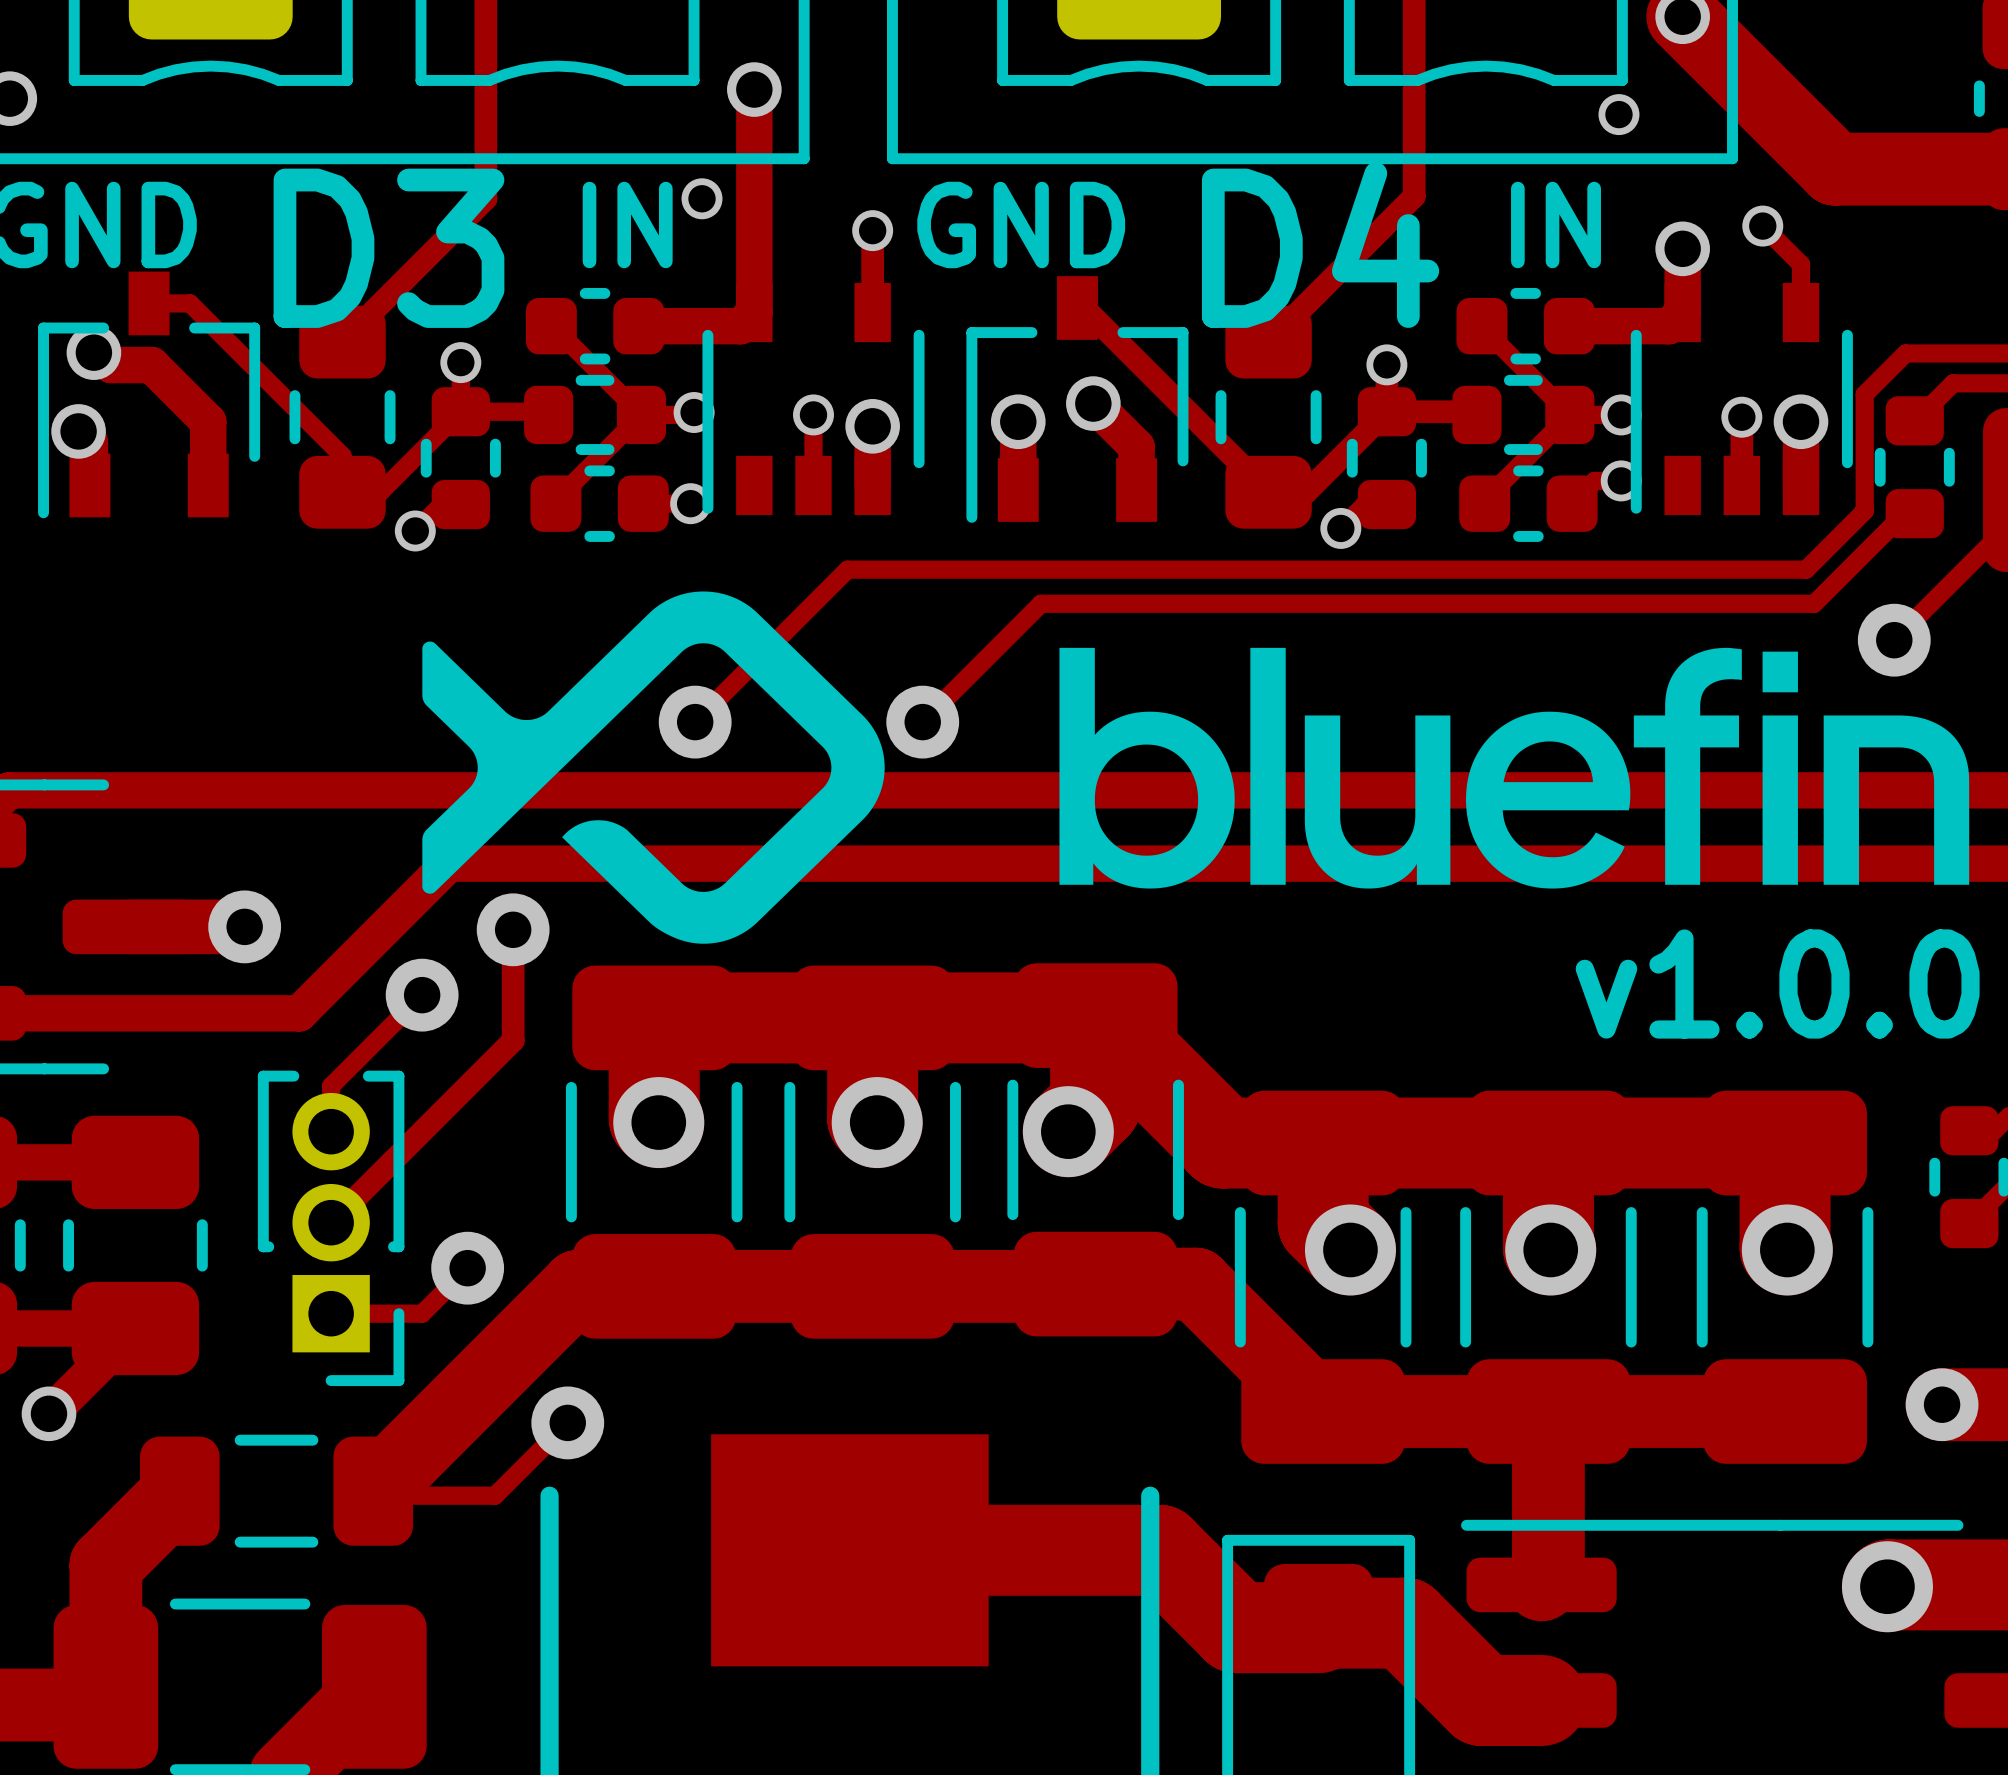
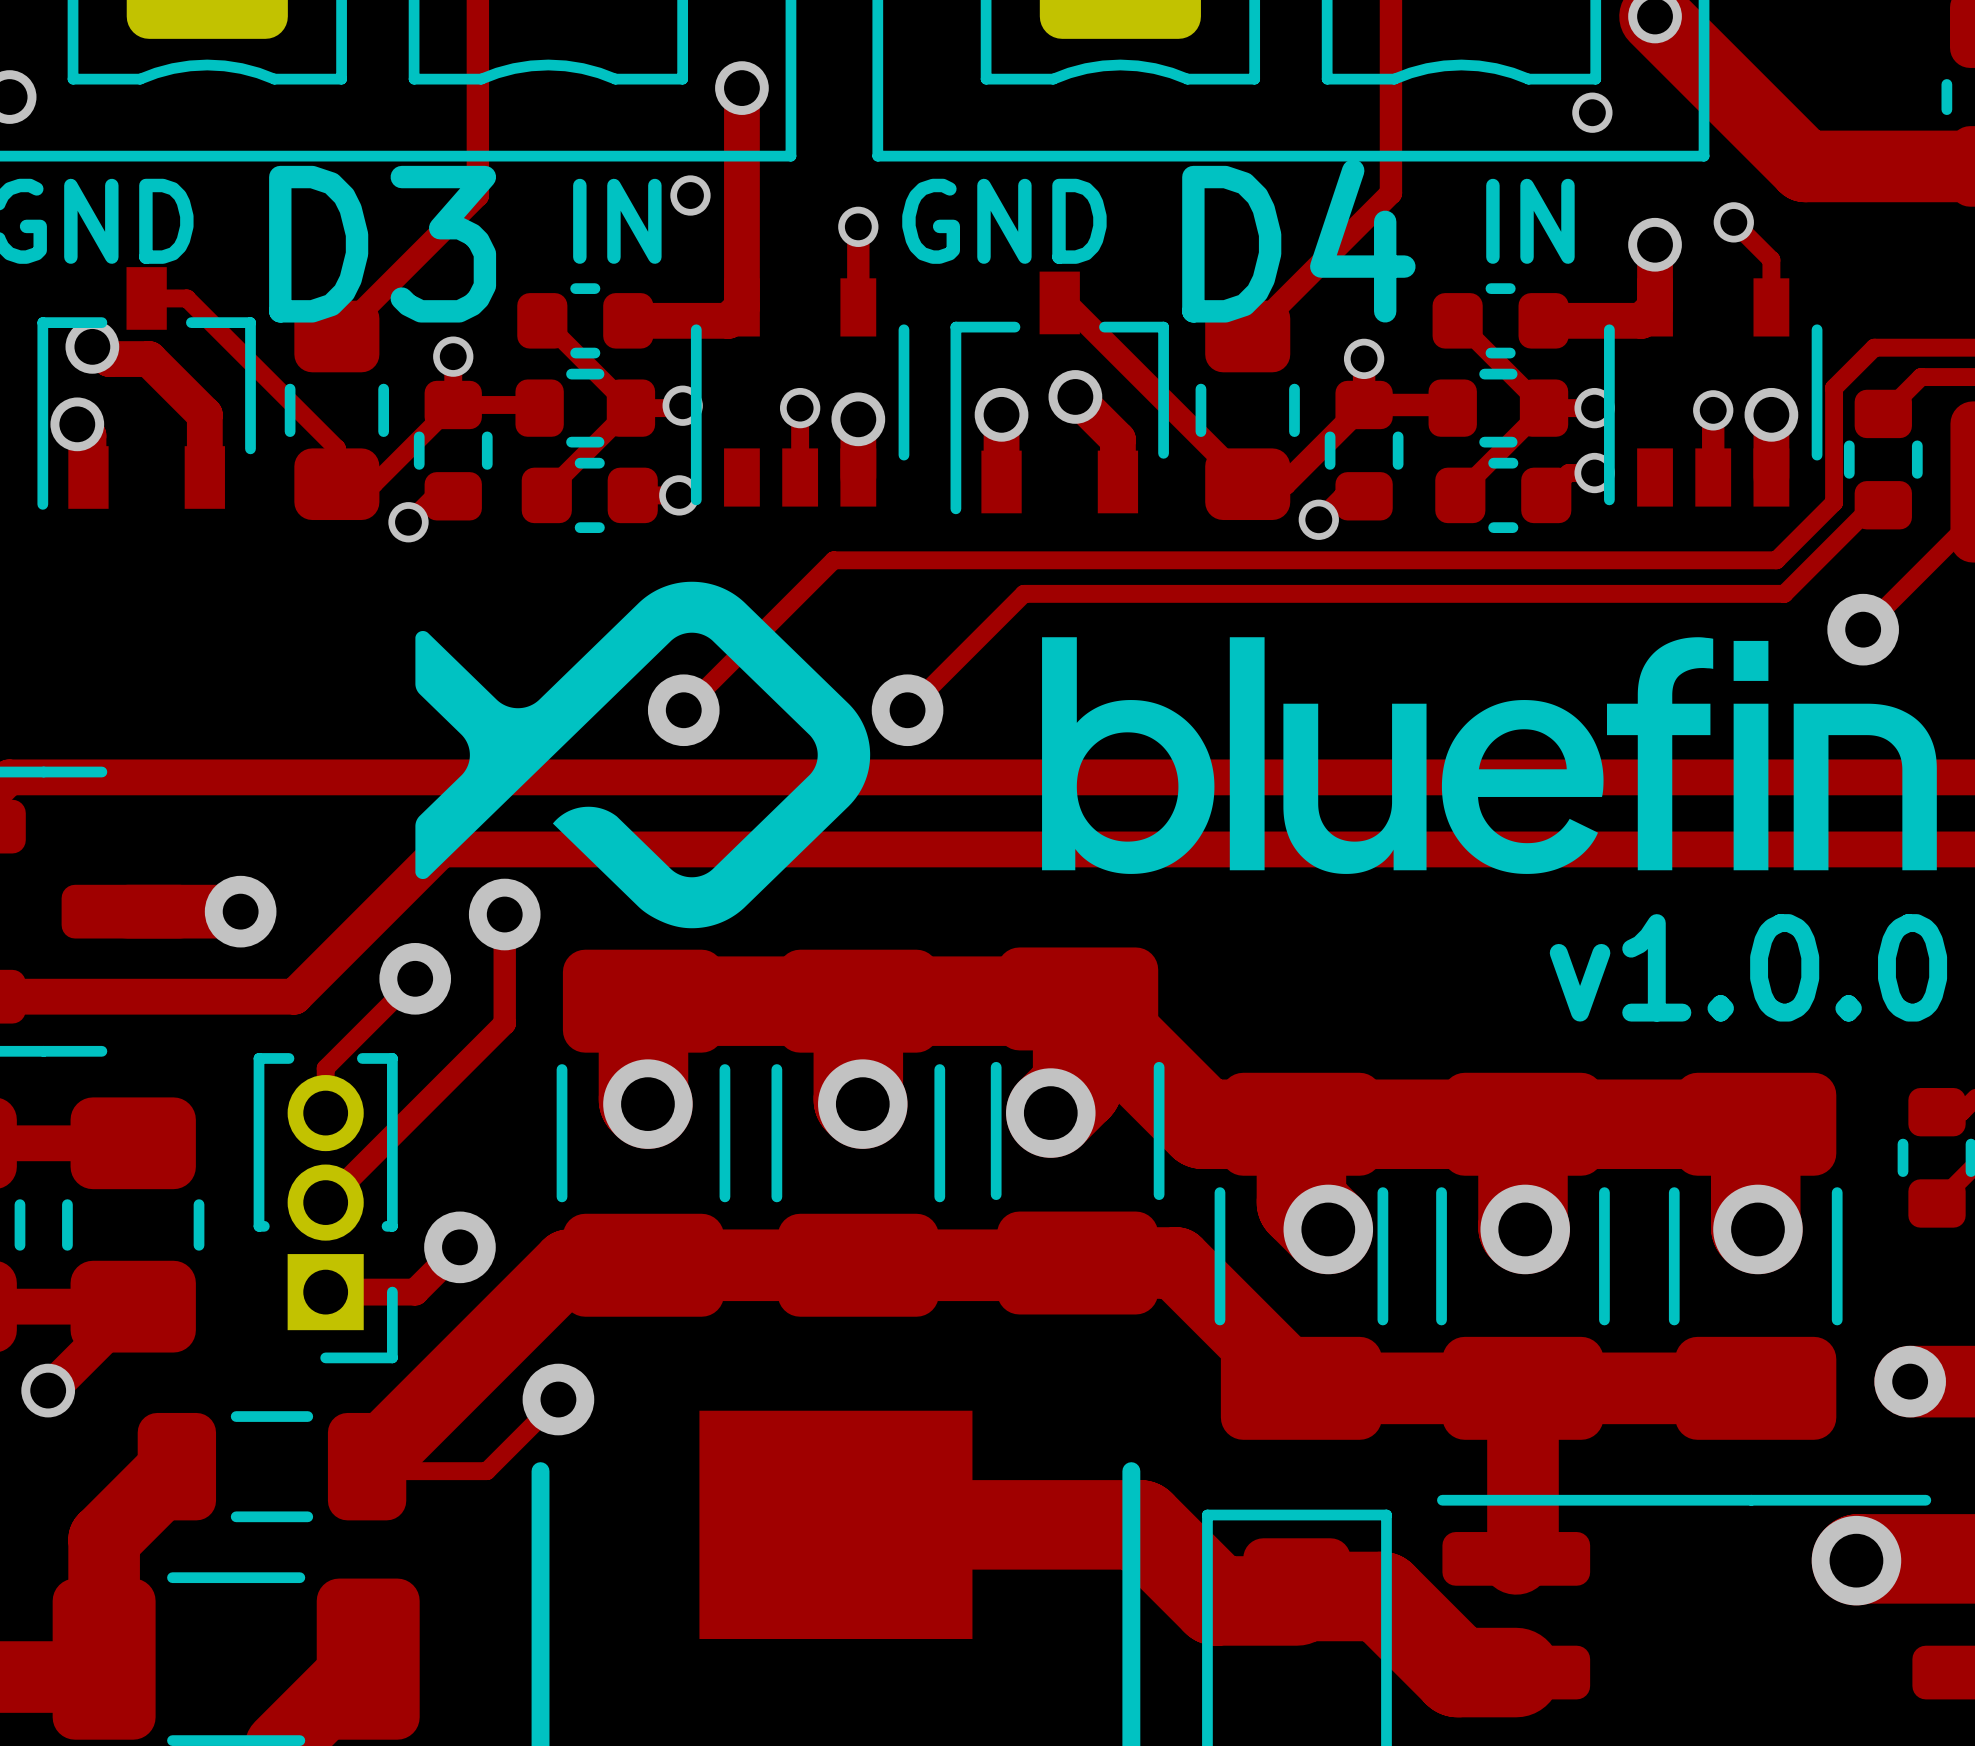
track width: thin (467, 1268) (422, 1313) (331, 1313) -> thick (459, 1247) (415, 1292) (325, 1292)

